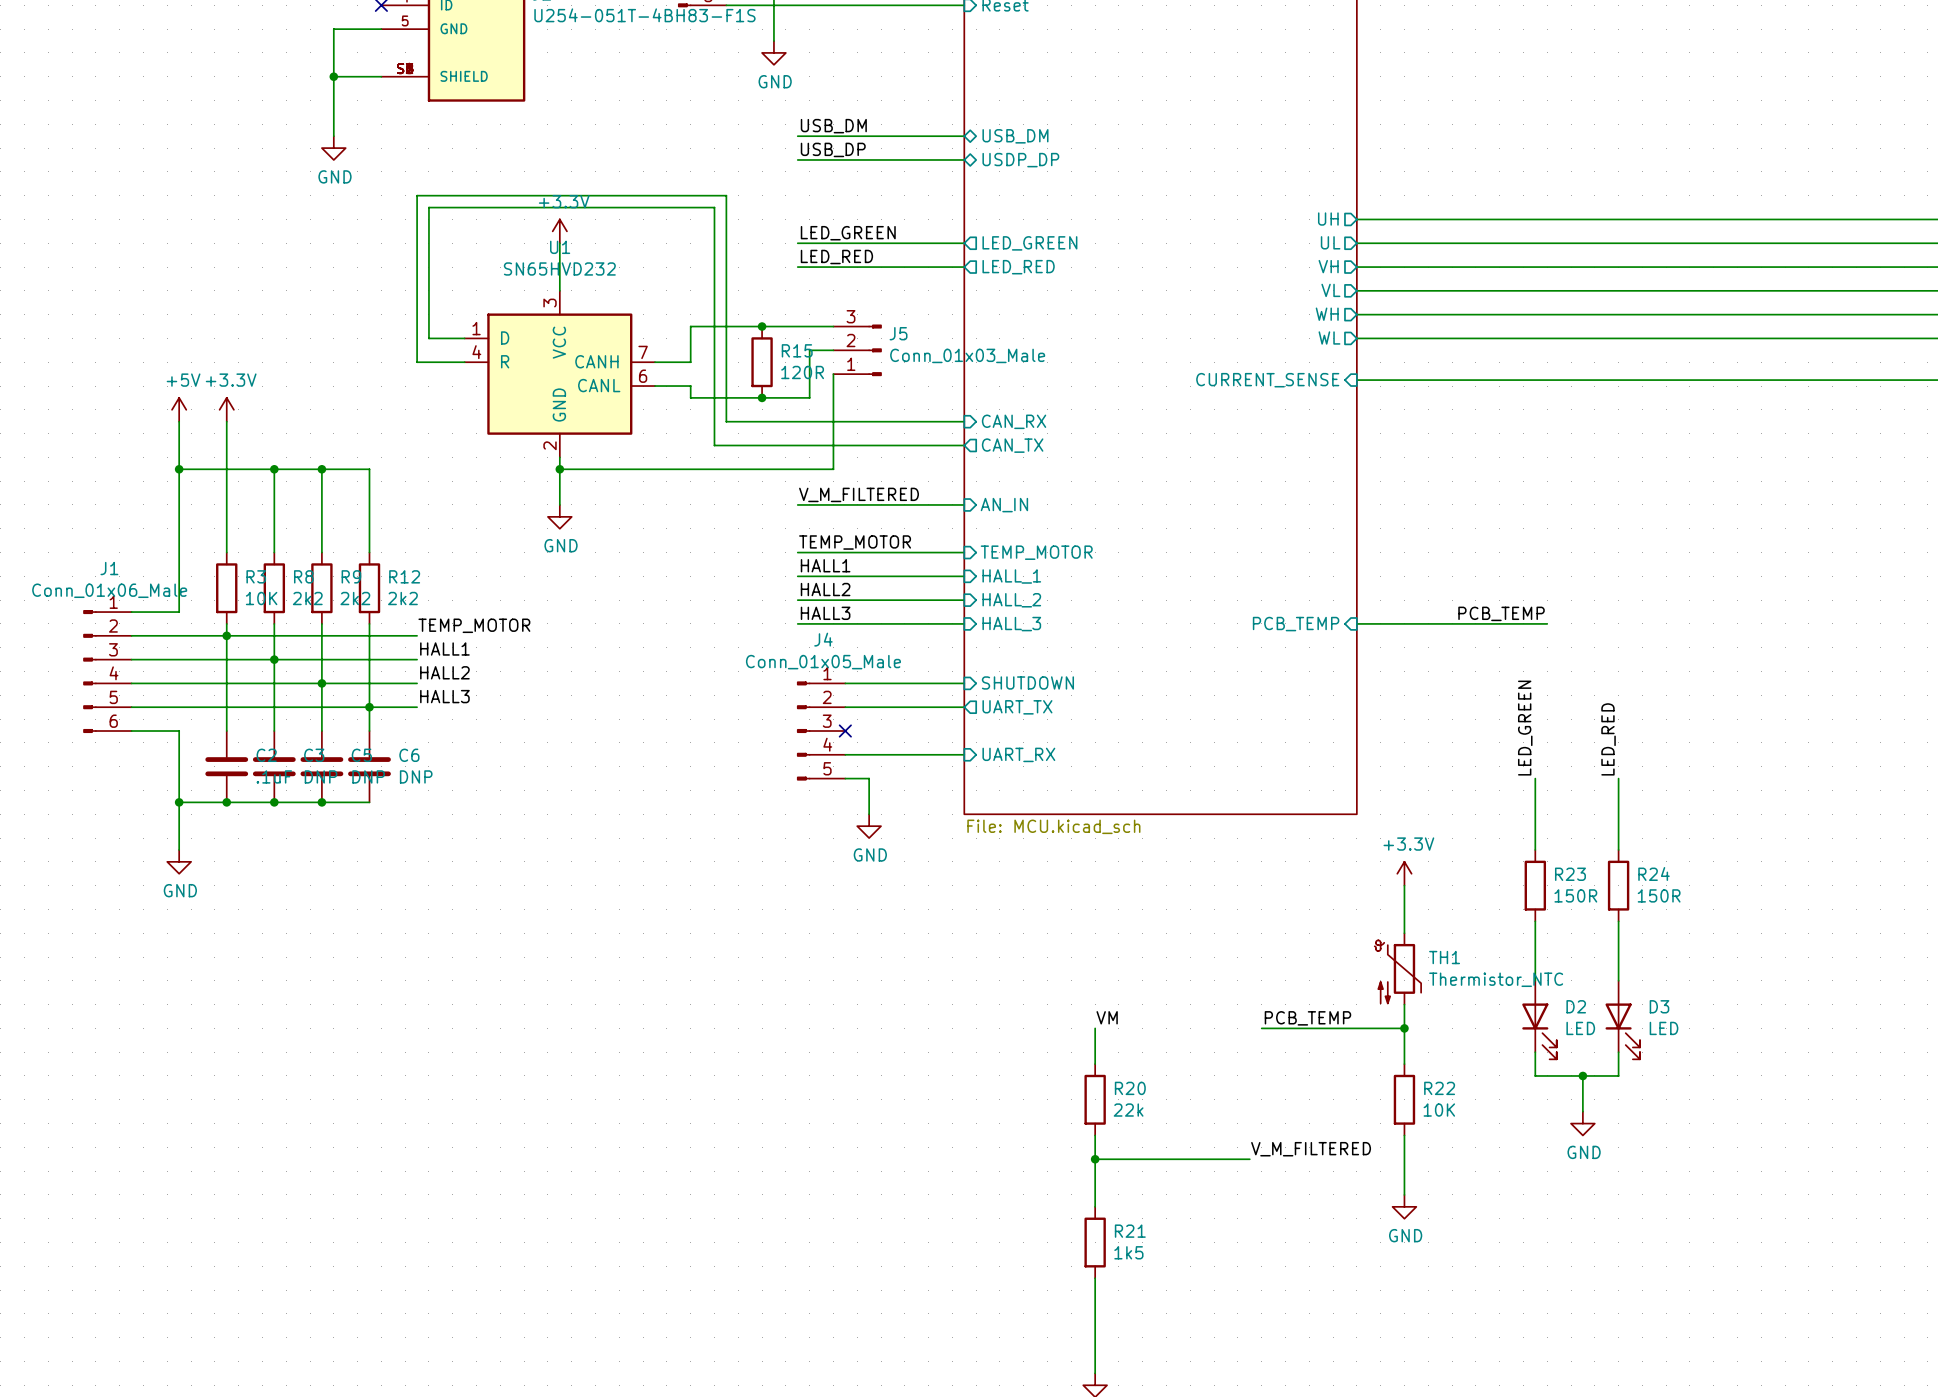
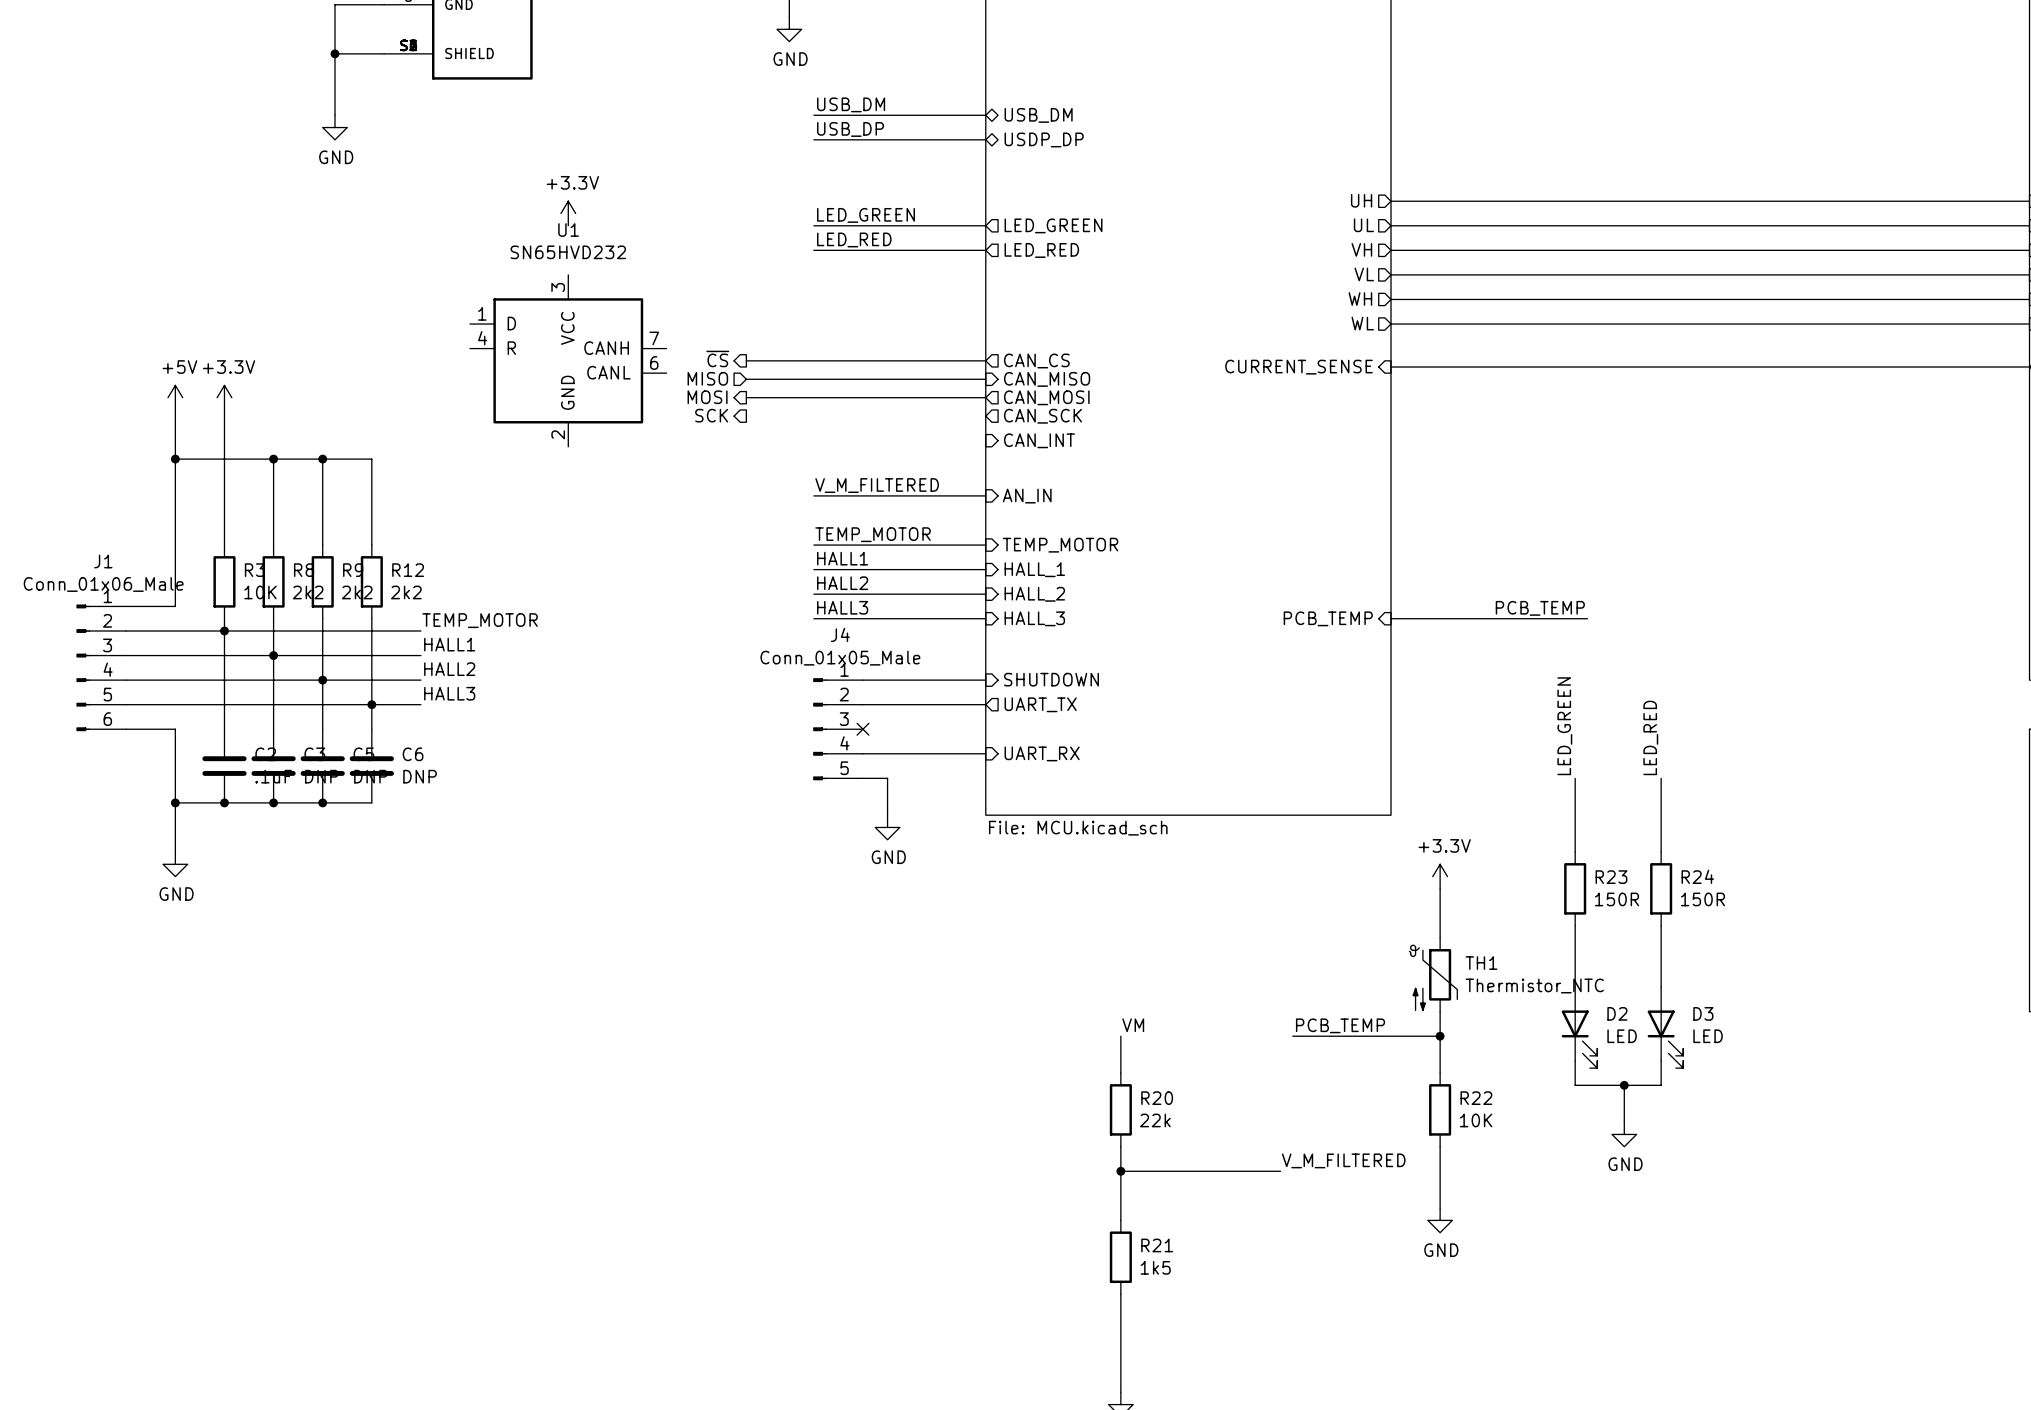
wire: (559, 243) (559, 290) -> none
junction: (762, 326) -> none
wire: (833, 326) (690, 326) (690, 362) (655, 362) -> none
wire: (464, 338) (428, 338) (428, 207) (714, 207) (714, 445) (964, 445) -> none
wire: (833, 350) (809, 350) (809, 397) (690, 397) (690, 386) (655, 386) -> none
J5: Conn_01x03_Male (857, 350) -> none
wire: (464, 362) (417, 362) (417, 195) (726, 195) (726, 421) (964, 421) -> none
R15: 120R (762, 362) -> none
sheet pin: none -> ~{CS} (717, 358)
wire: none -> (746, 360) (985, 360)
wire: (833, 374) (833, 469) (559, 469) -> none
sheet pin: none -> CAN_CS (1036, 360)
sheet pin: none -> MISO (707, 378)
wire: none -> (746, 379) (985, 379)
sheet pin: none -> CAN_MISO (1047, 379)
junction: (762, 397) -> none
sheet pin: none -> MOSI (707, 397)
wire: none -> (746, 397) (985, 397)
sheet pin: none -> CAN_MOSI (1046, 397)
sheet pin shape: input (1014, 421) -> output (1042, 416)
sheet pin: CAN_RX (1014, 421) -> CAN_SCK (1042, 416)
sheet pin: none -> SCK (711, 415)
sheet pin shape: output (1012, 445) -> input (1039, 440)
sheet pin: CAN_TX (1012, 445) -> CAN_INT (1039, 440)
wire: (559, 457) (559, 504) -> none
junction: (559, 469) -> none
power symbol: GND (559, 516) -> none

